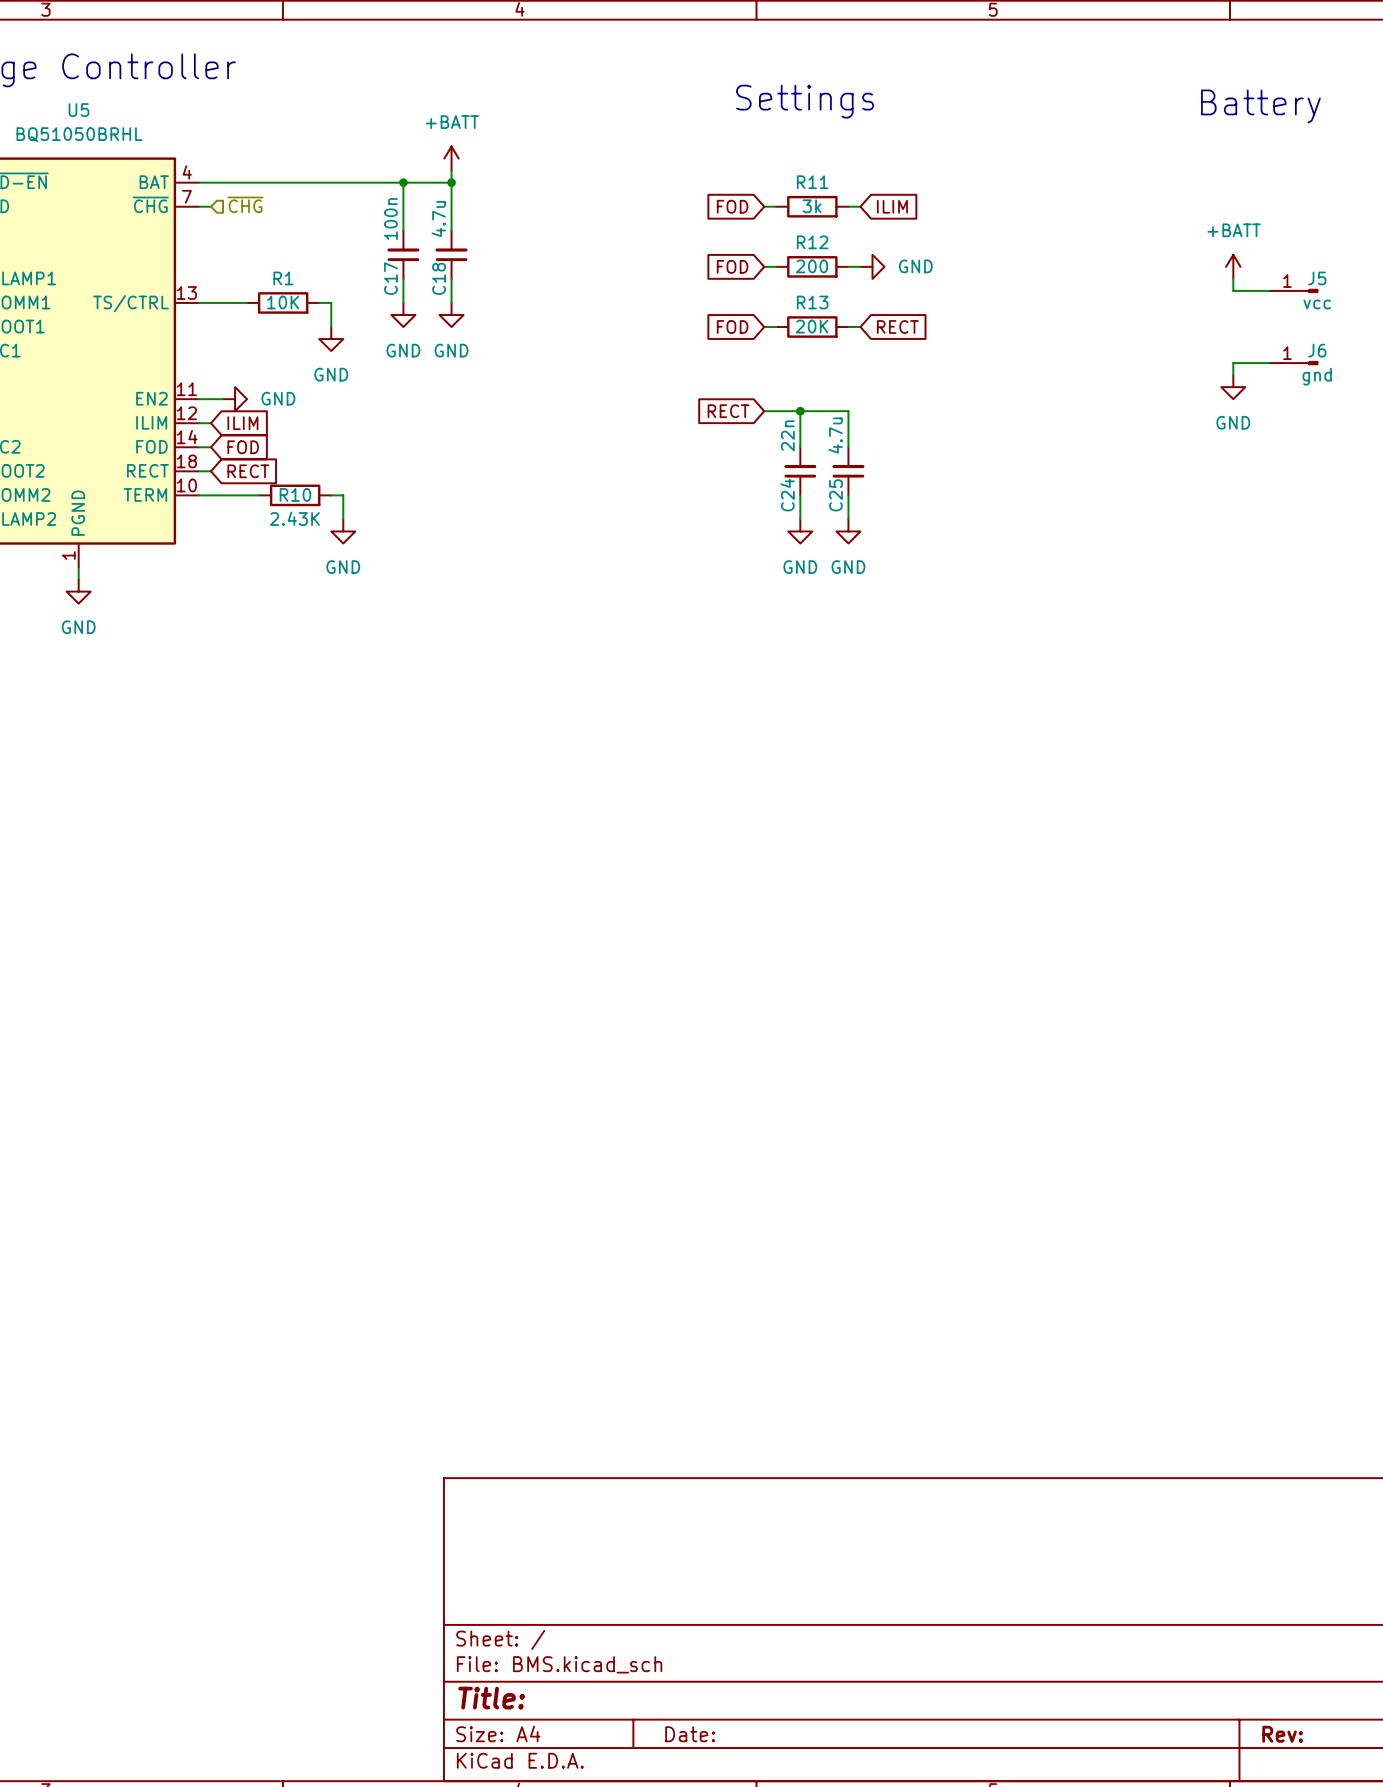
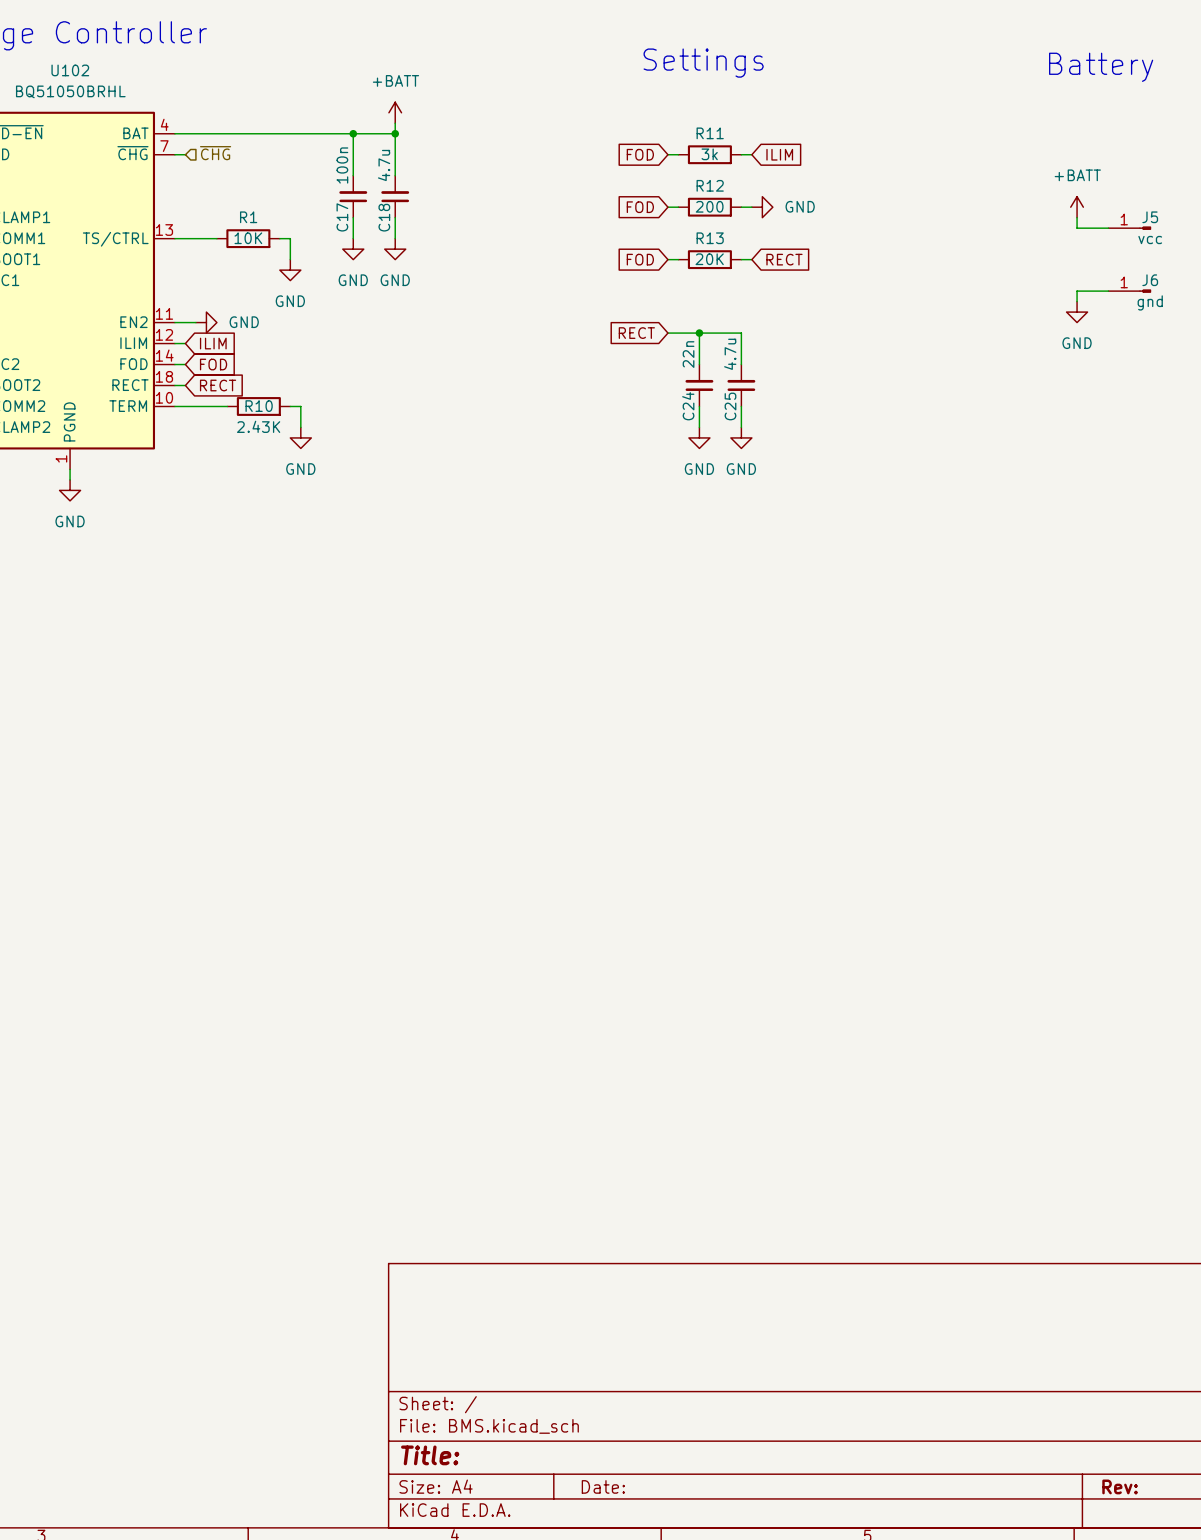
U5 name: U5 (78, 110) -> U102 (70, 70)

